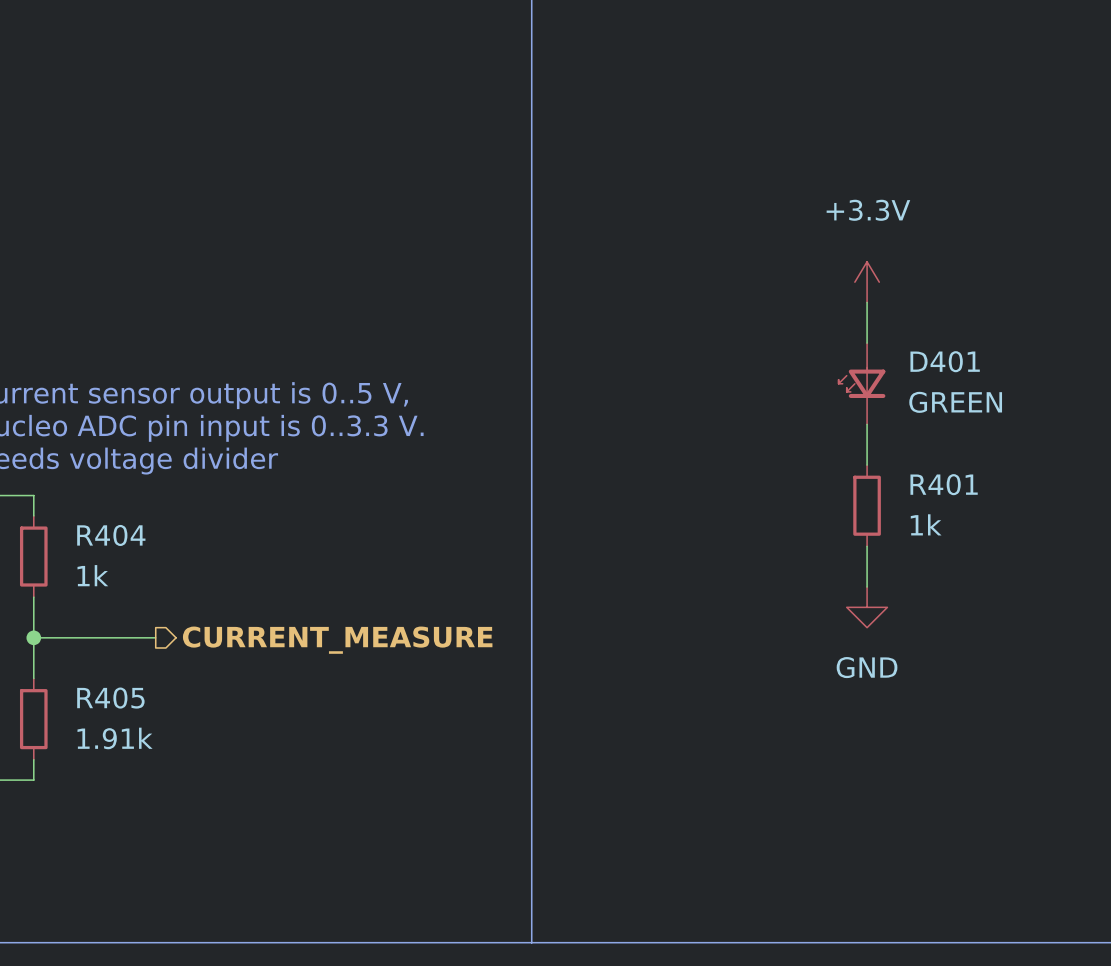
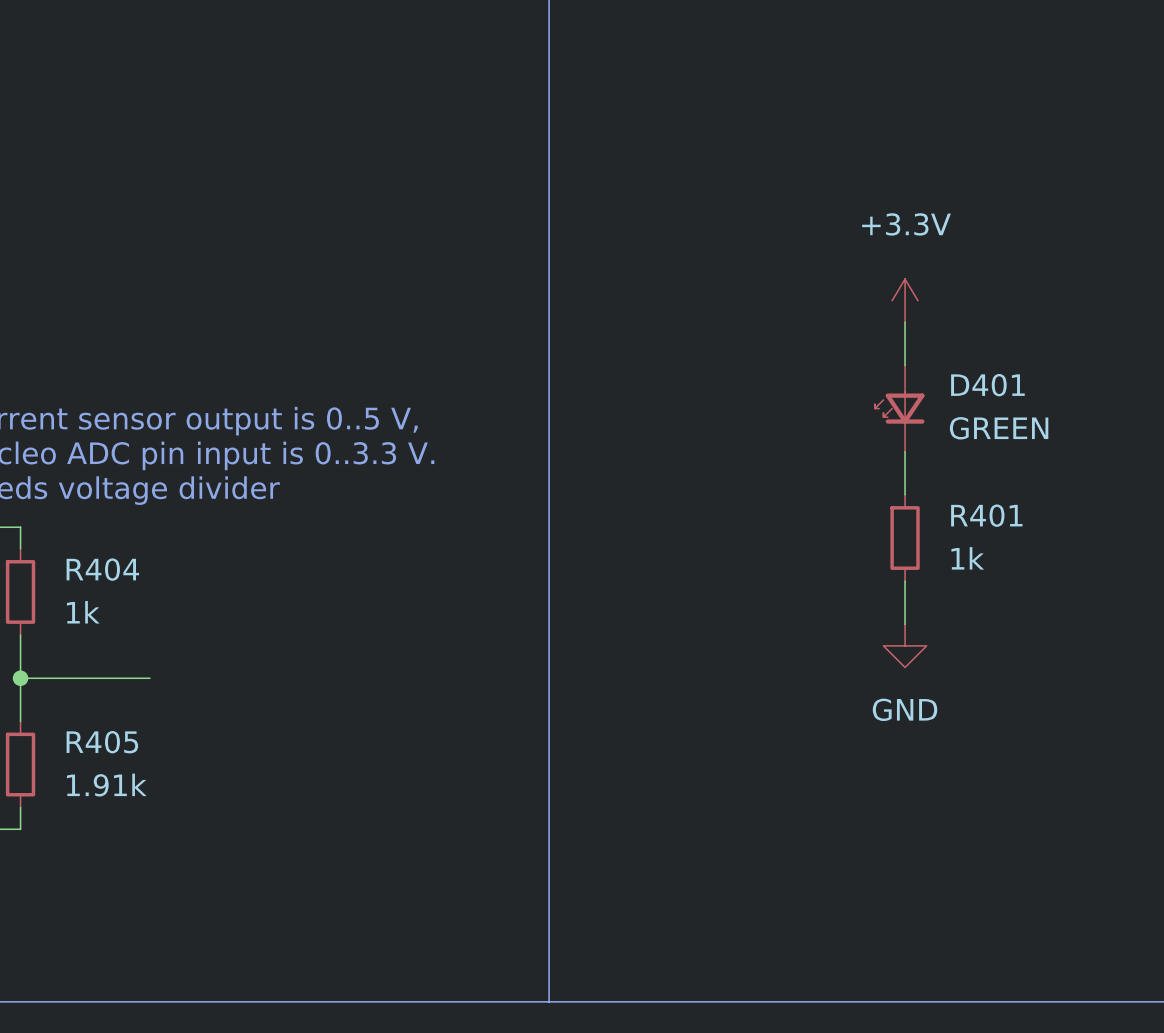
hierarchical label: CURRENT_MEASURE (337, 640) -> none

